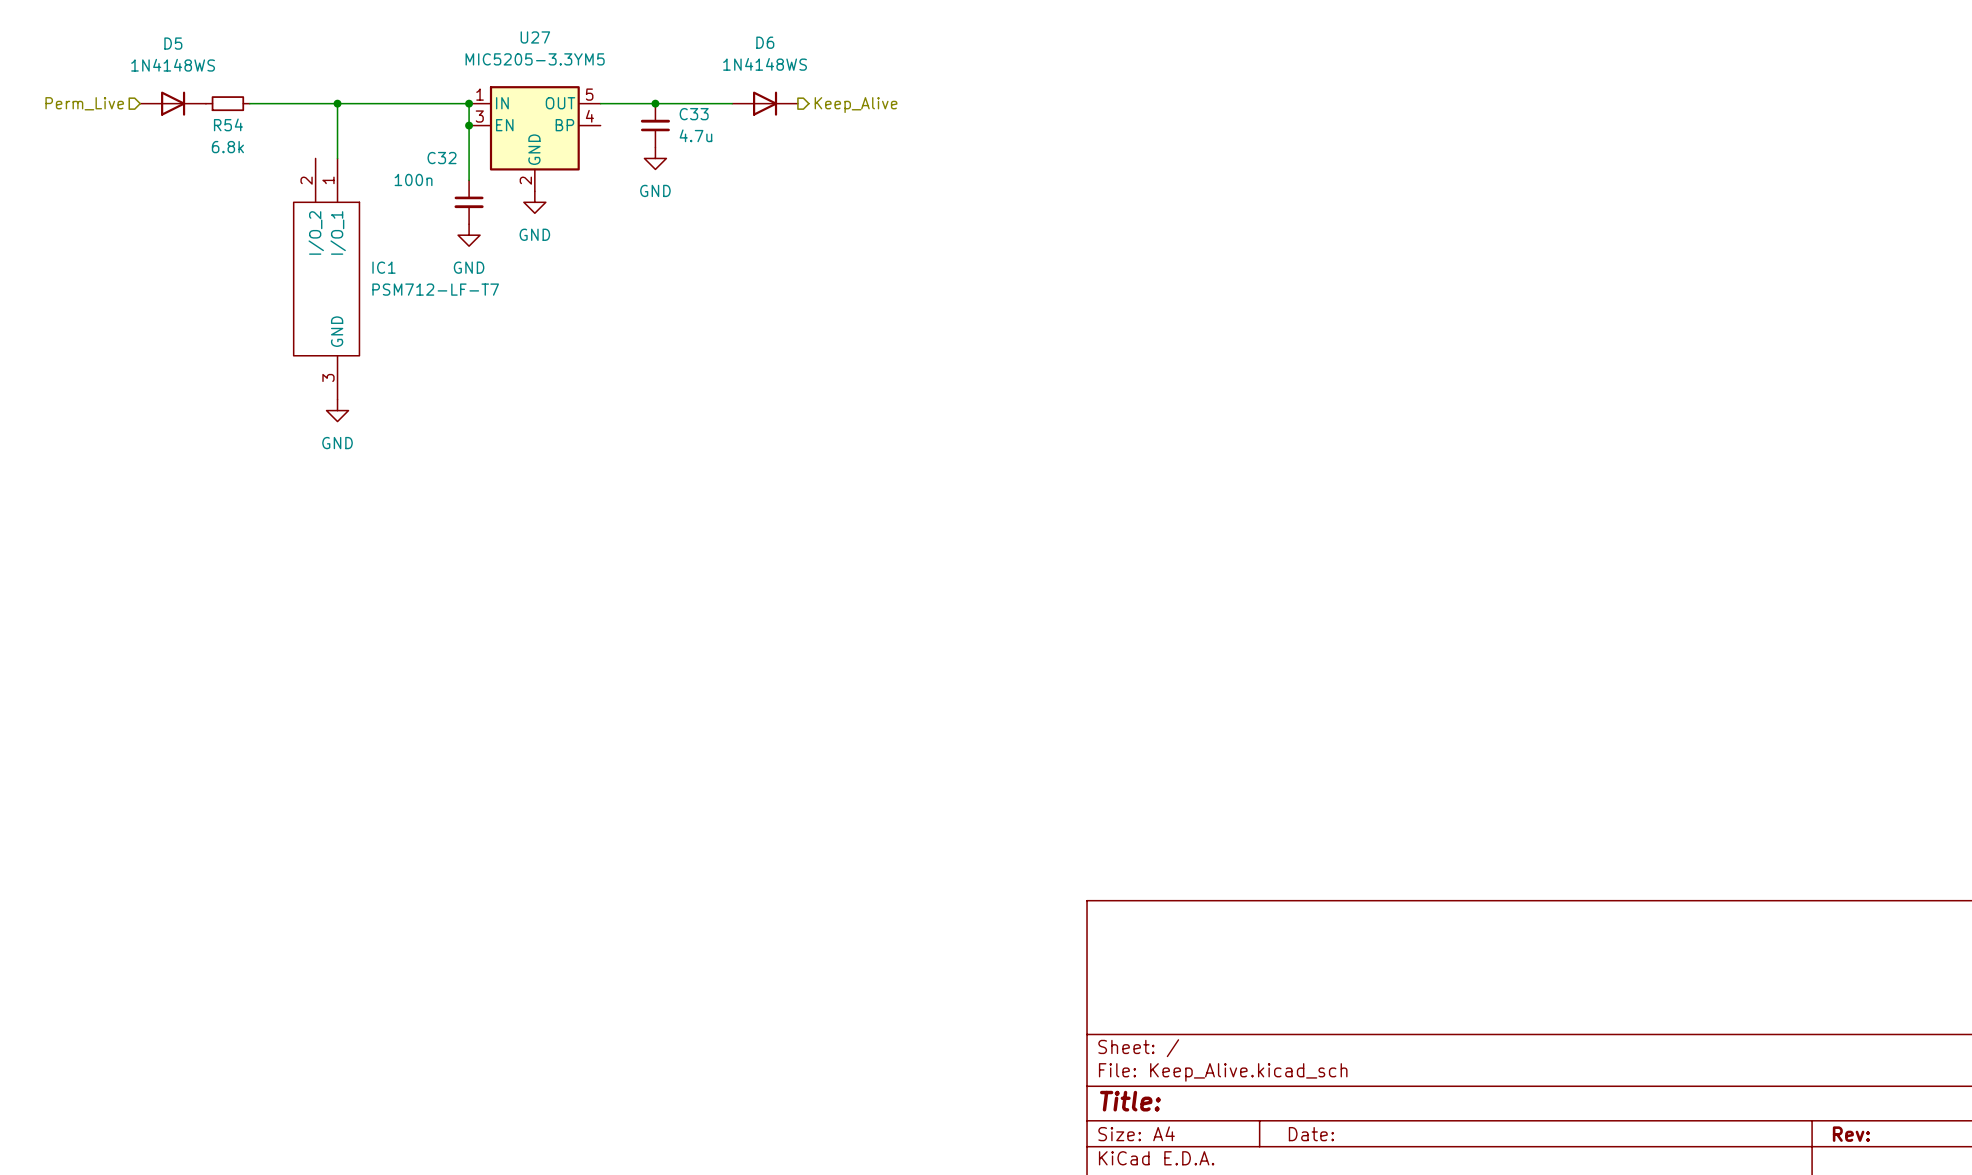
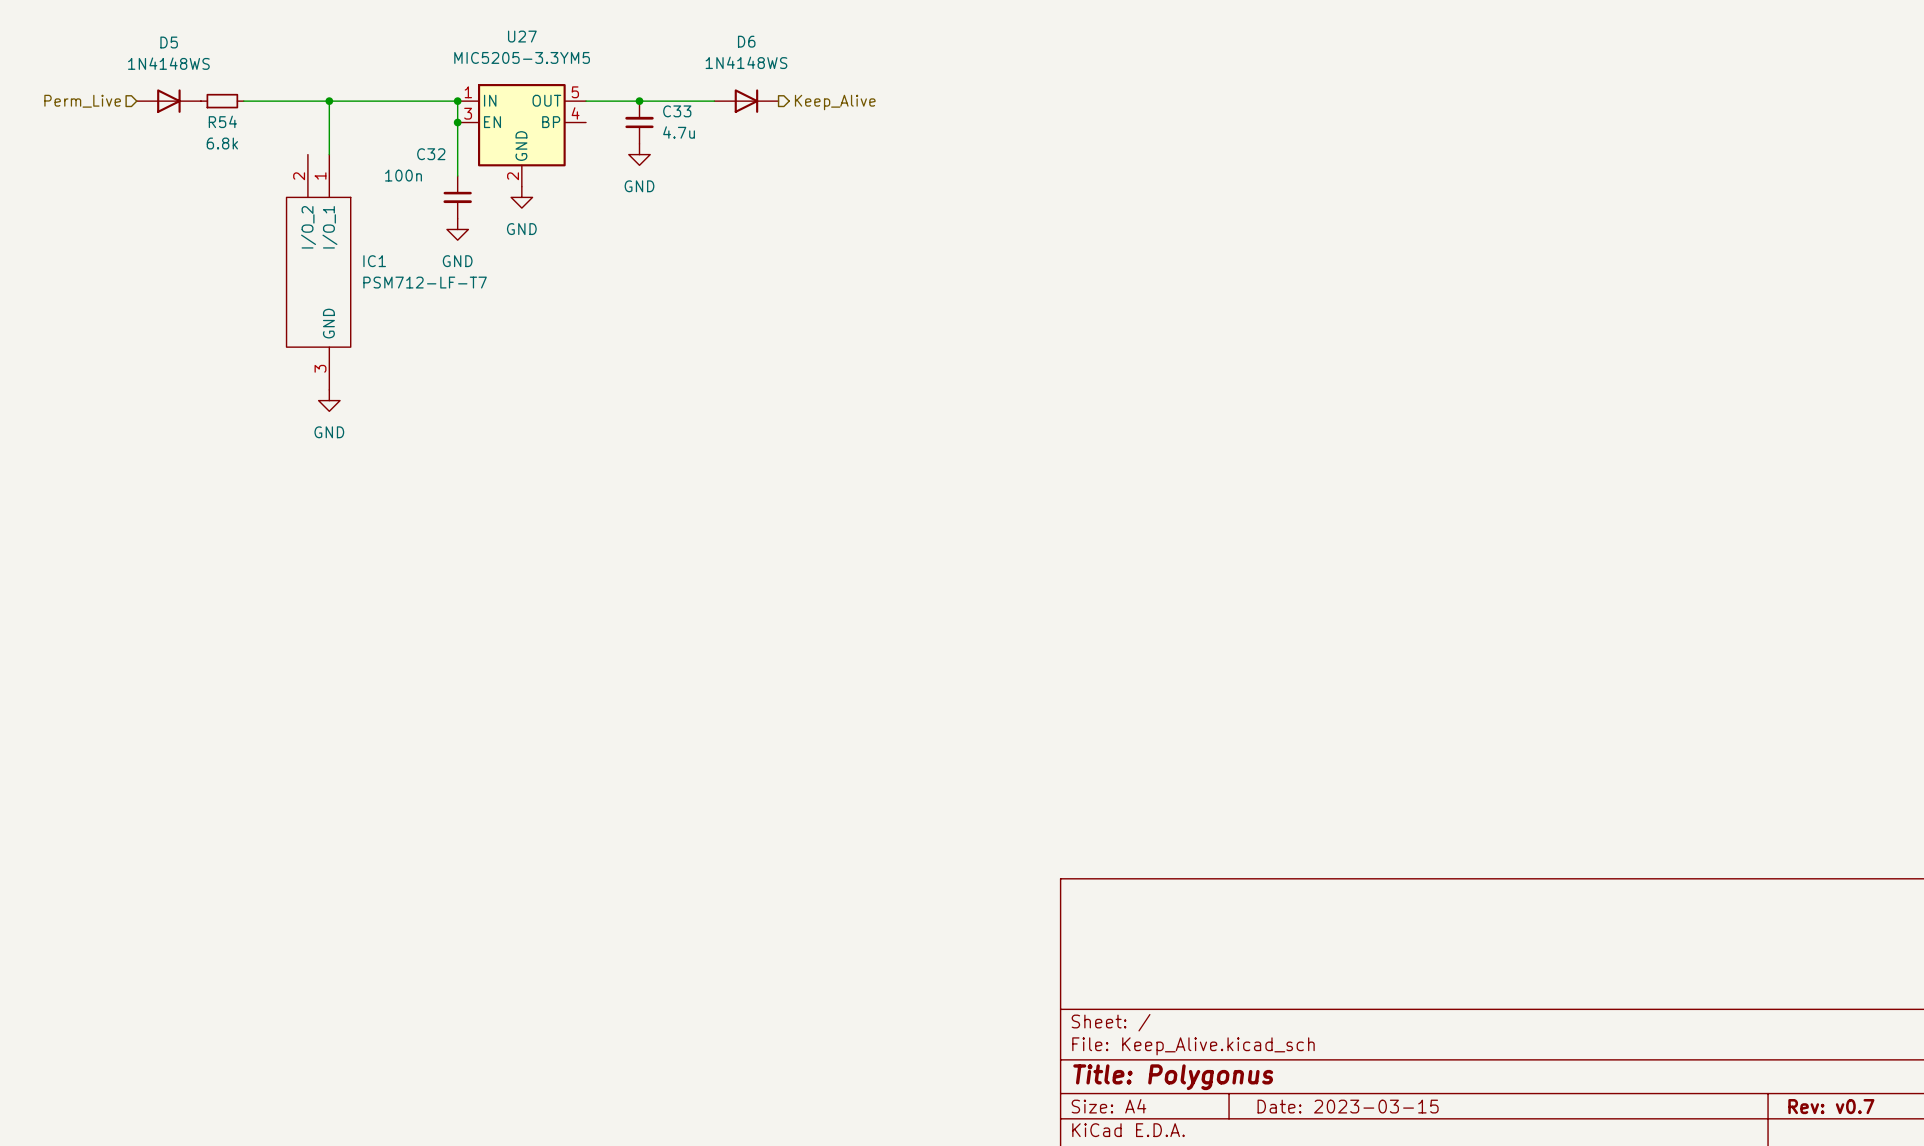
title block: Title: (1130, 1101) -> Title: Polygonus (1173, 1077)
title block: Date: (1311, 1134) -> Date: 2023-03-15 (1348, 1106)
title block: Rev: (1851, 1134) -> Rev: v0.7 (1831, 1106)

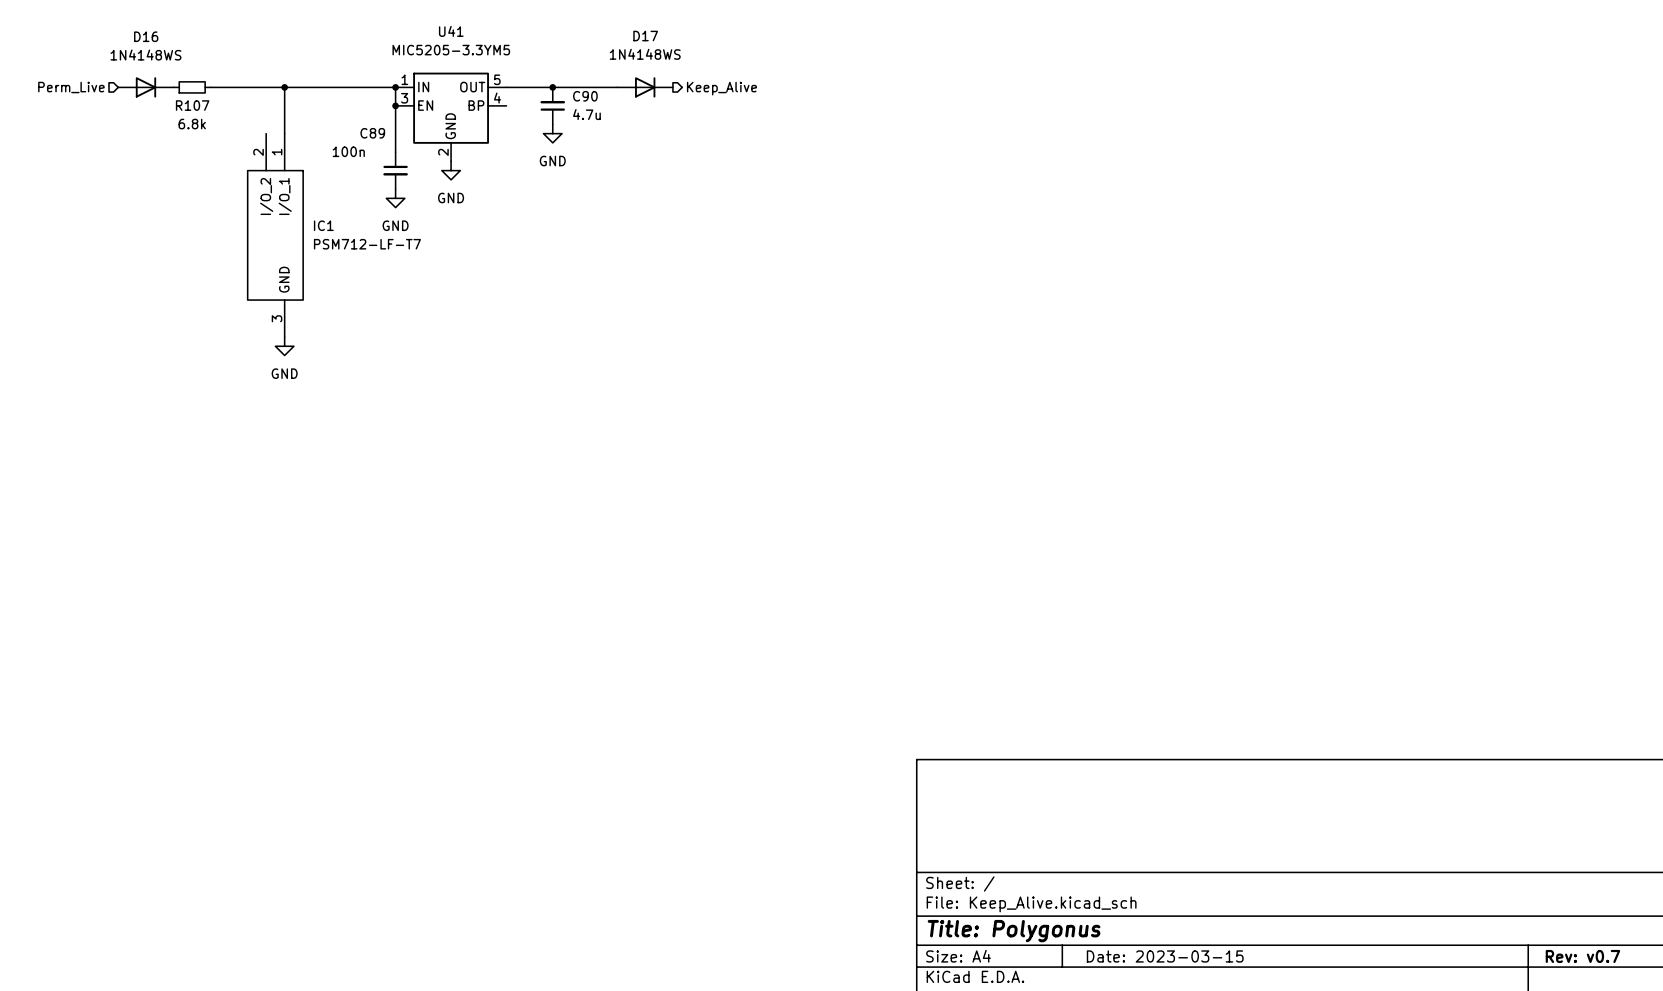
U27 name: U27 (522, 36) -> U41 (451, 31)
D6 name: D6 (746, 41) -> D17 (645, 36)
D5 name: D5 (169, 42) -> D16 (146, 36)
C33 name: C33 (677, 111) -> C90 (585, 96)
R54 name: R54 (222, 121) -> R107 (192, 105)
C32 name: C32 (431, 154) -> C89 (372, 133)

